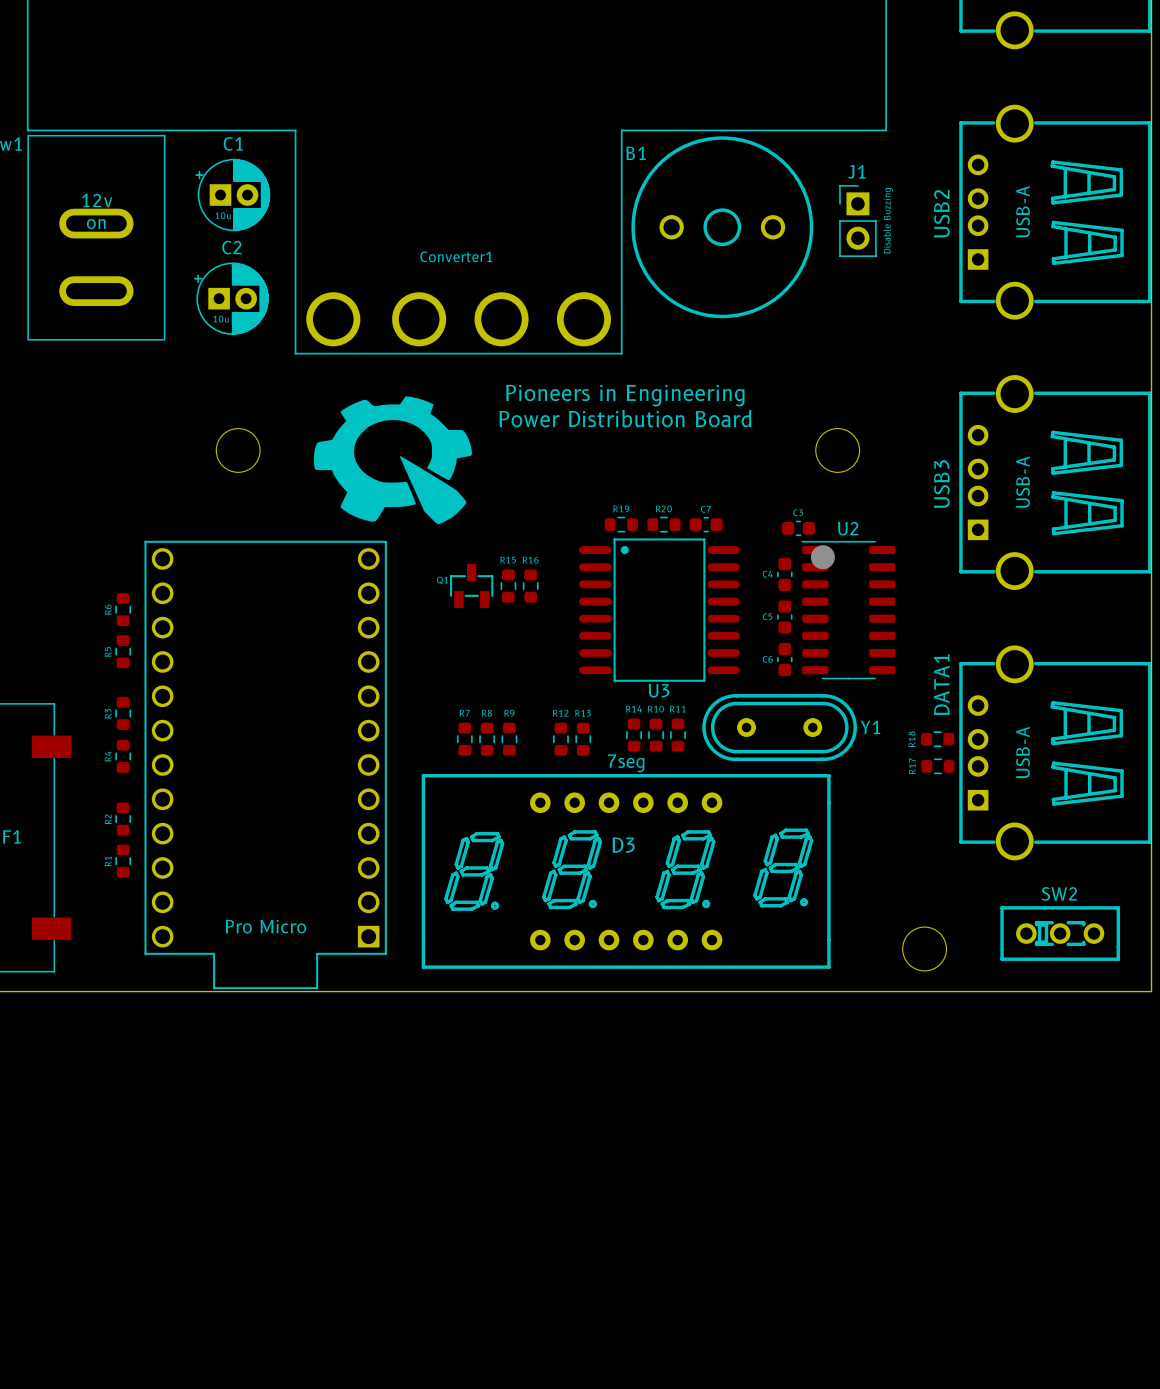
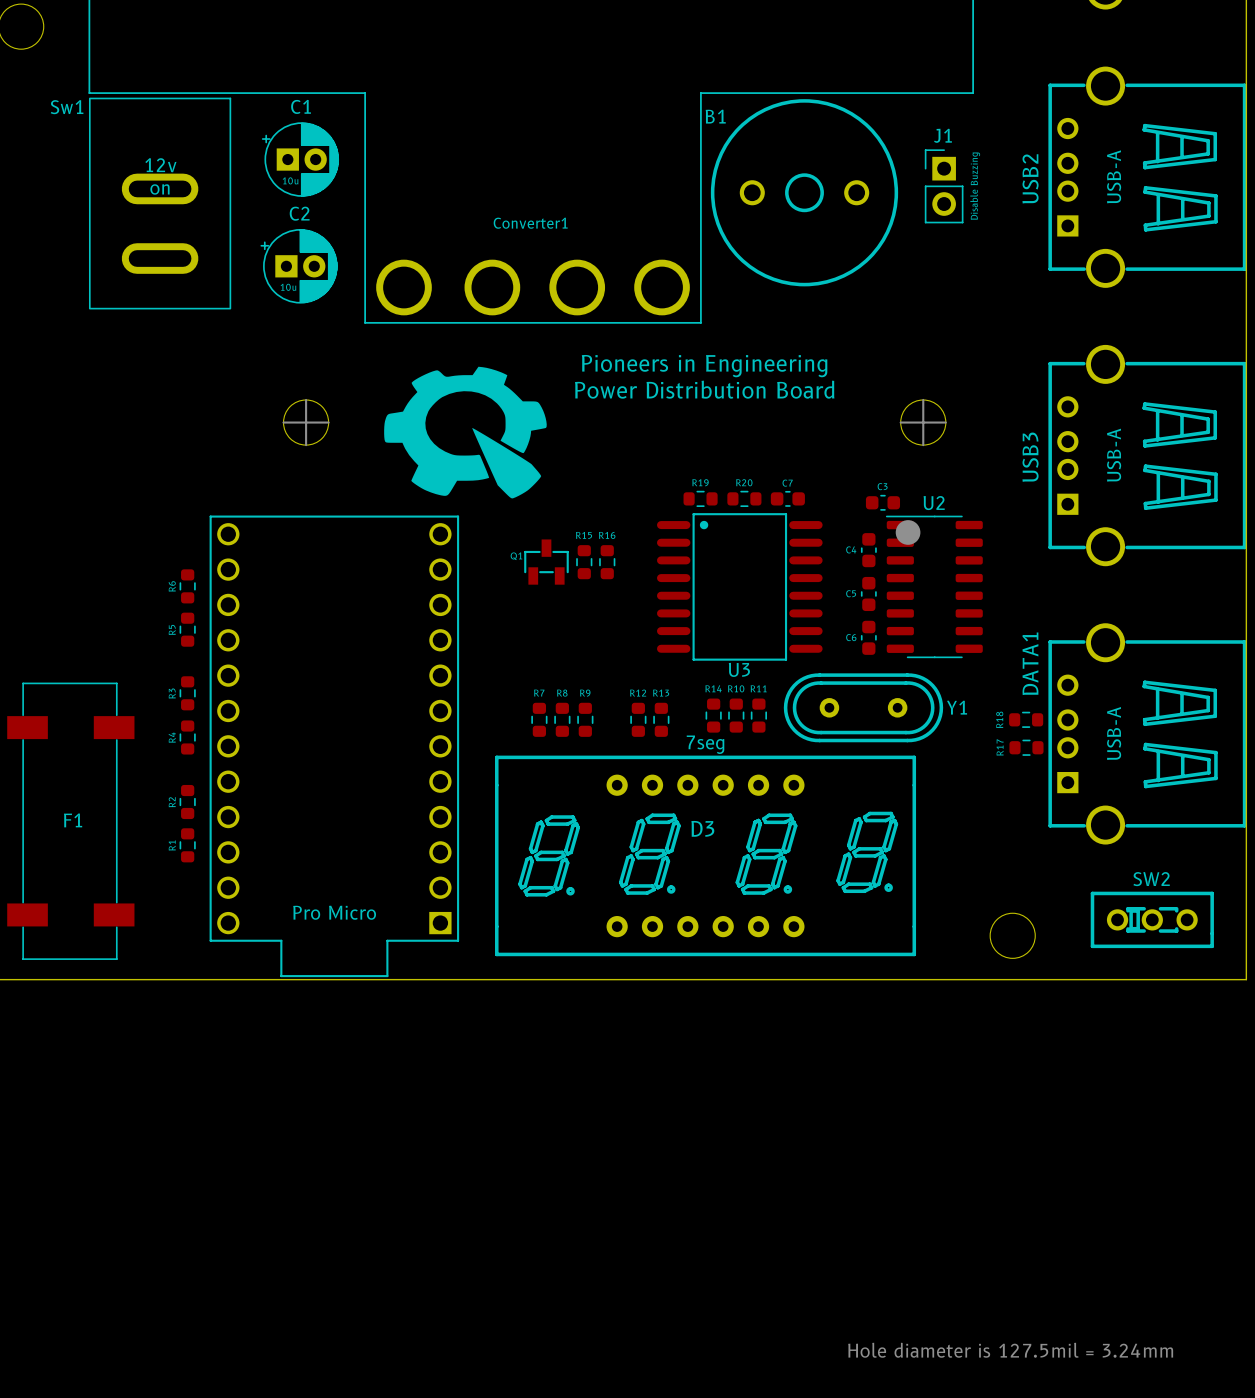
line: none -> (306, 399) (306, 445)
line: none -> (923, 399) (923, 445)
line: none -> (283, 422) (328, 422)
line: none -> (900, 422) (945, 422)
text: none -> Hole diameter is 127.5mil = 3.24mm (1010, 1350)

